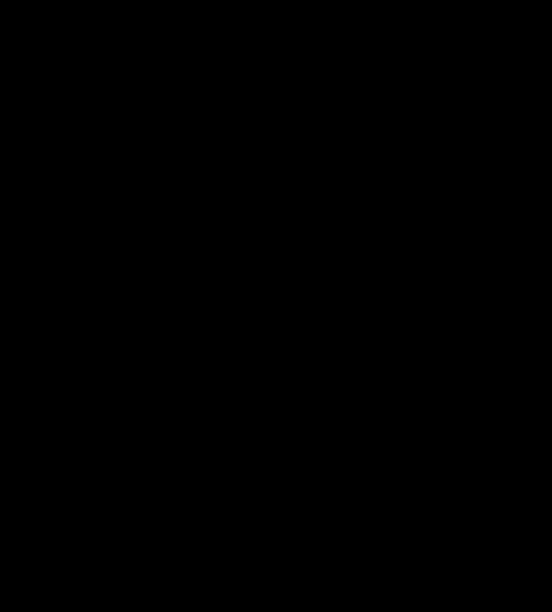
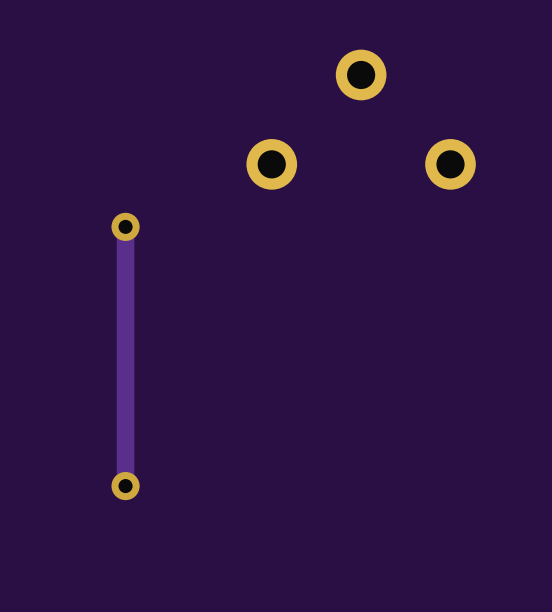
part: none -> (361, 119)
track: none -> (125, 226) (125, 486)
via: none -> (125, 226)
via: none -> (125, 486)

